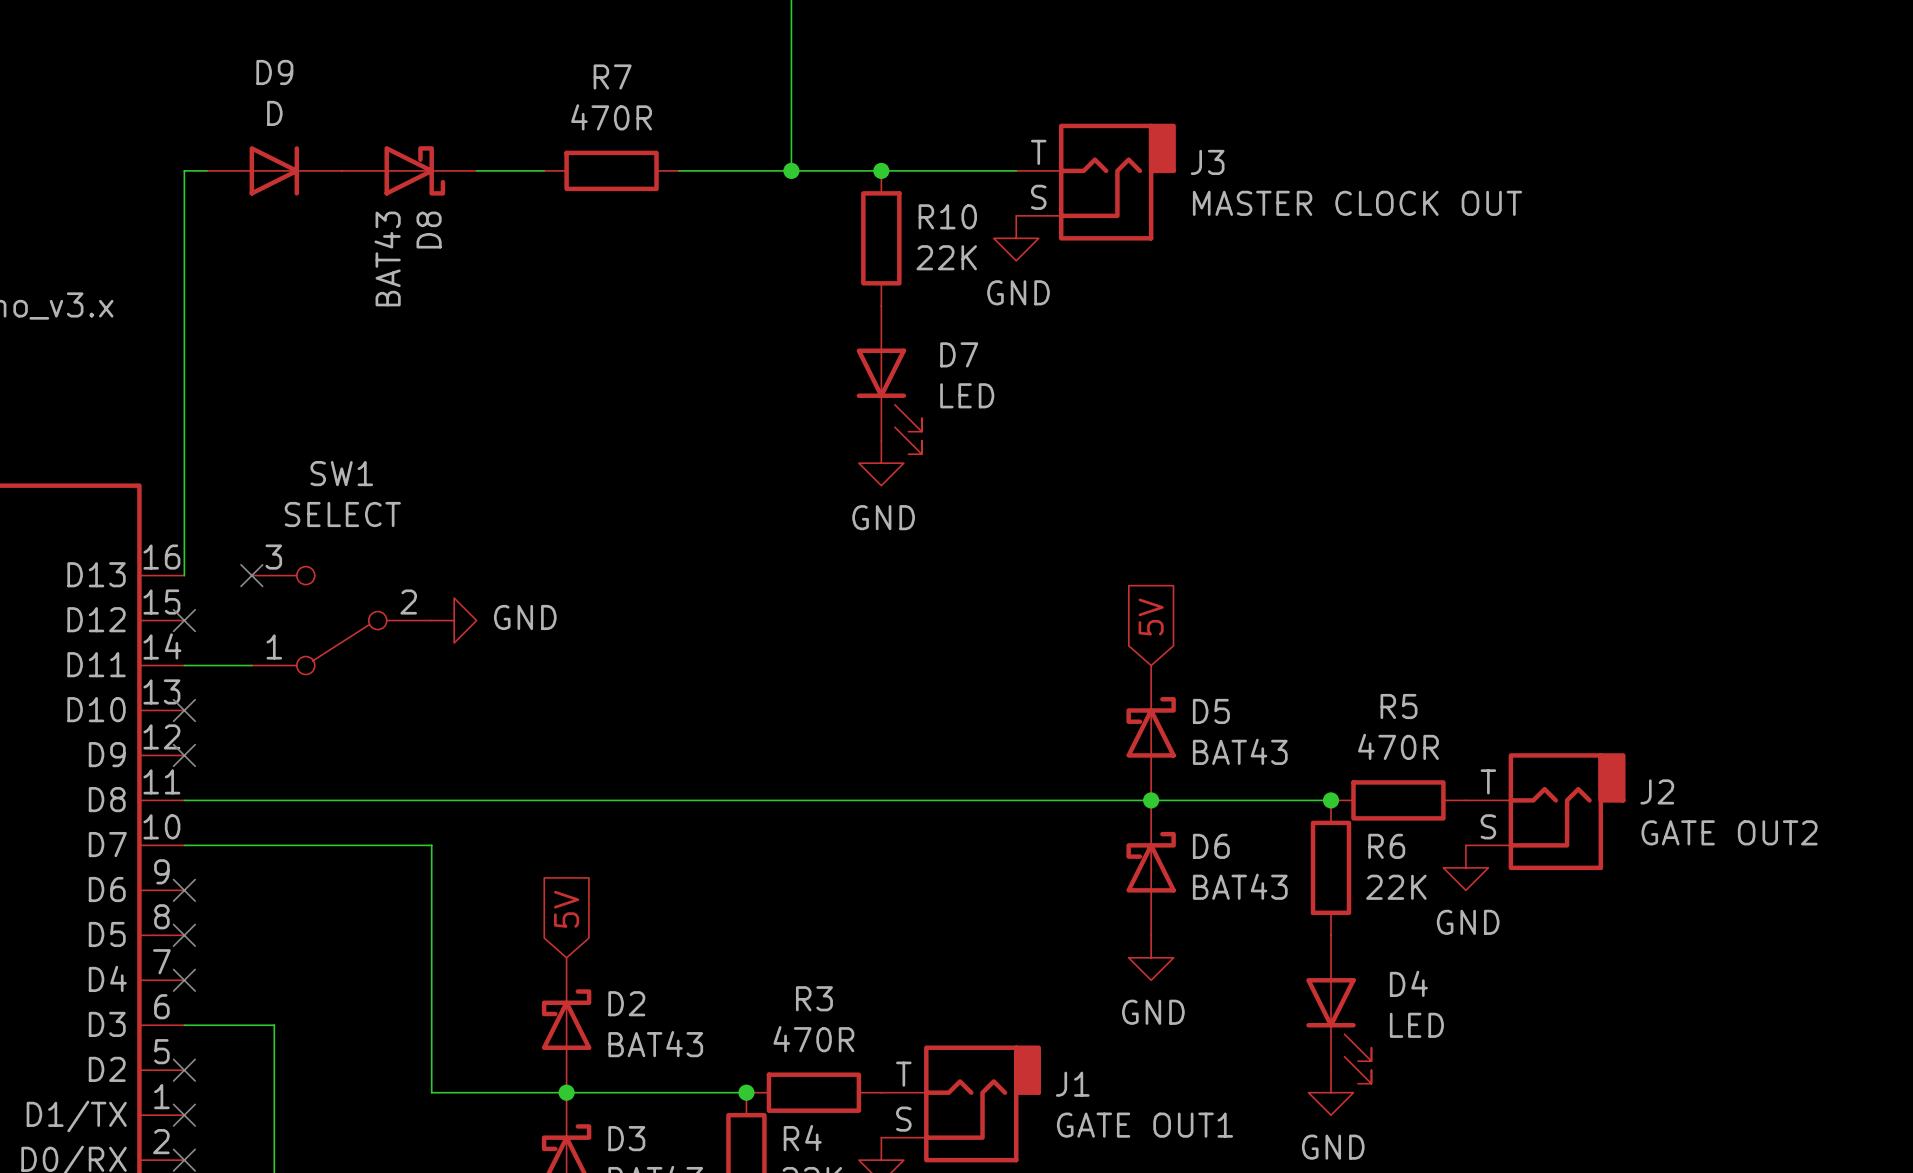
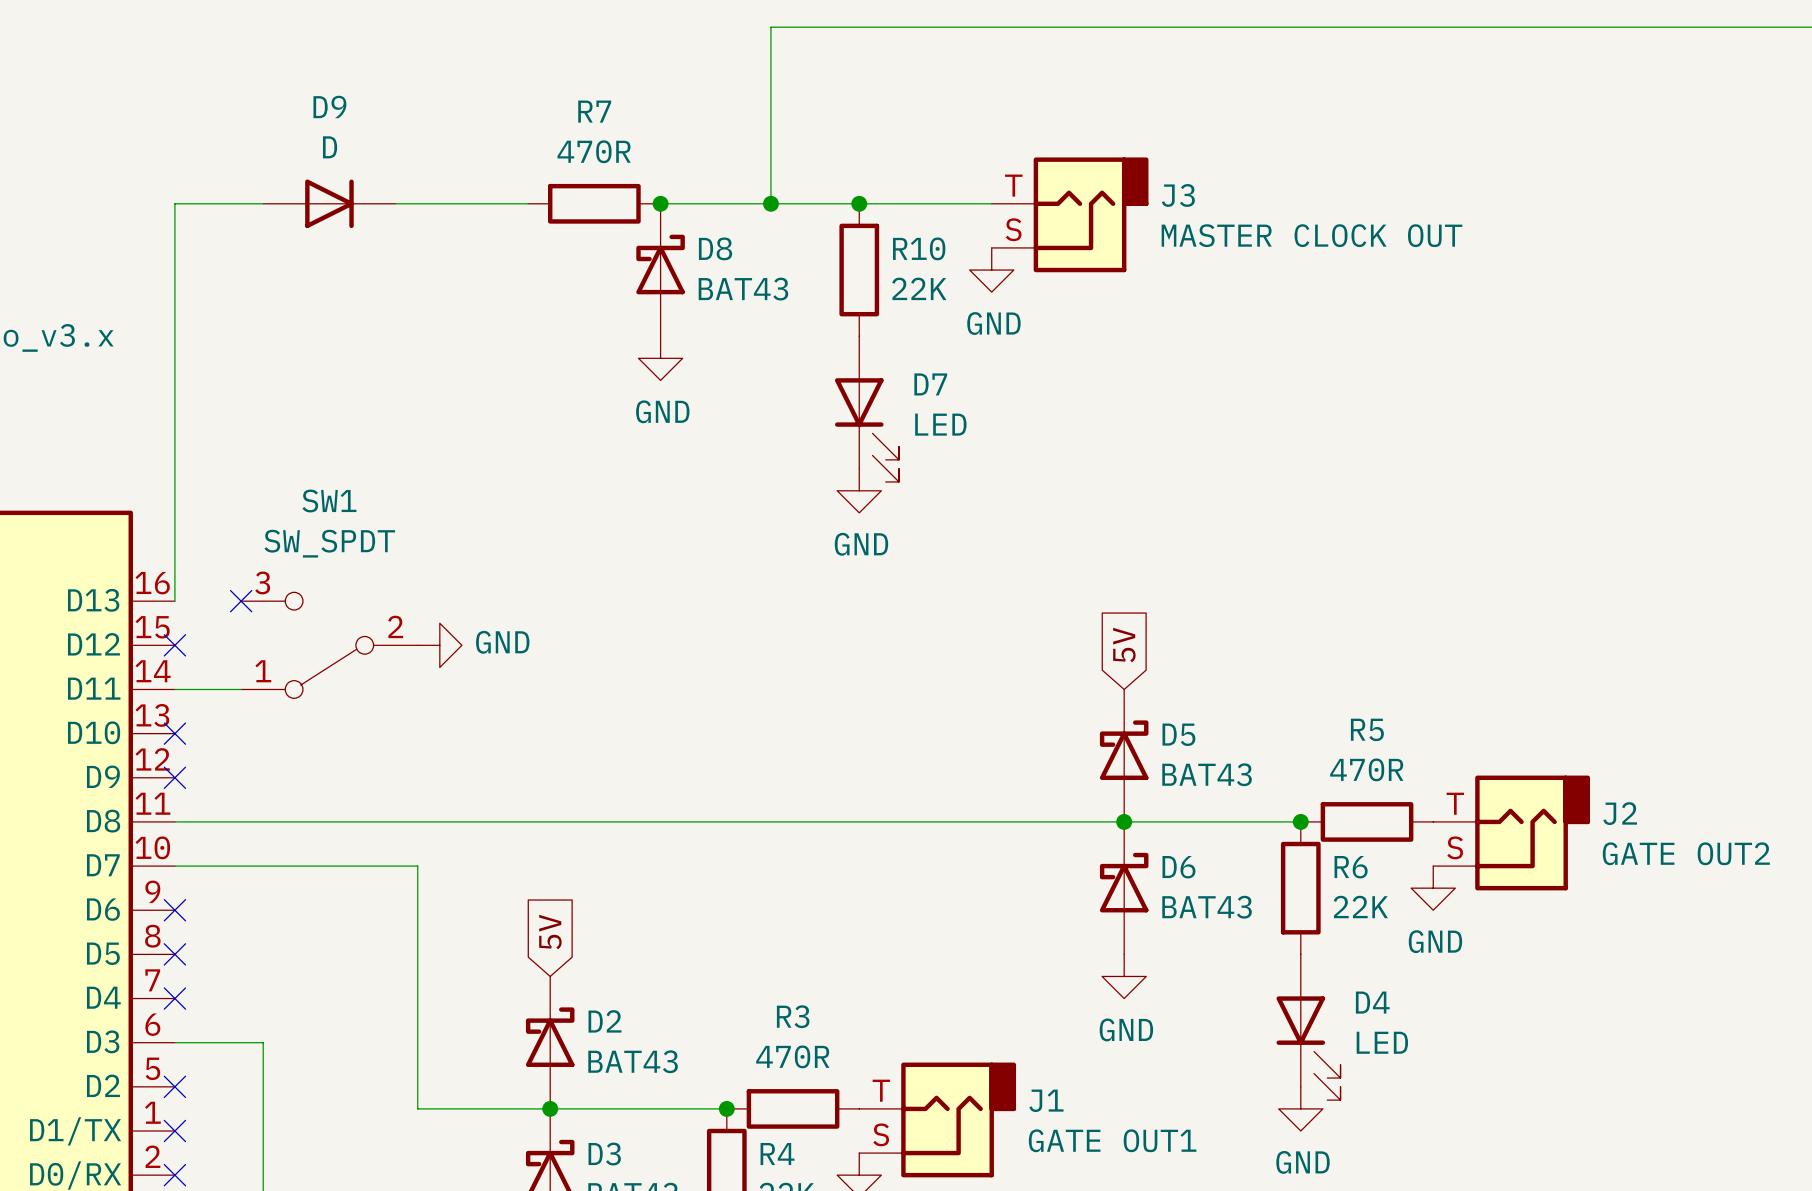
D9 position: (274, 170) -> (329, 203)
D8 position: (409, 170) -> (660, 270)
D8 rotation: 0° (414, 170) -> 90° counterclockwise (660, 264)
junction: none -> (660, 203)
power symbol: none -> GND (660, 358)
SW1 value: SELECT (342, 514) -> SW_SPDT (329, 543)

